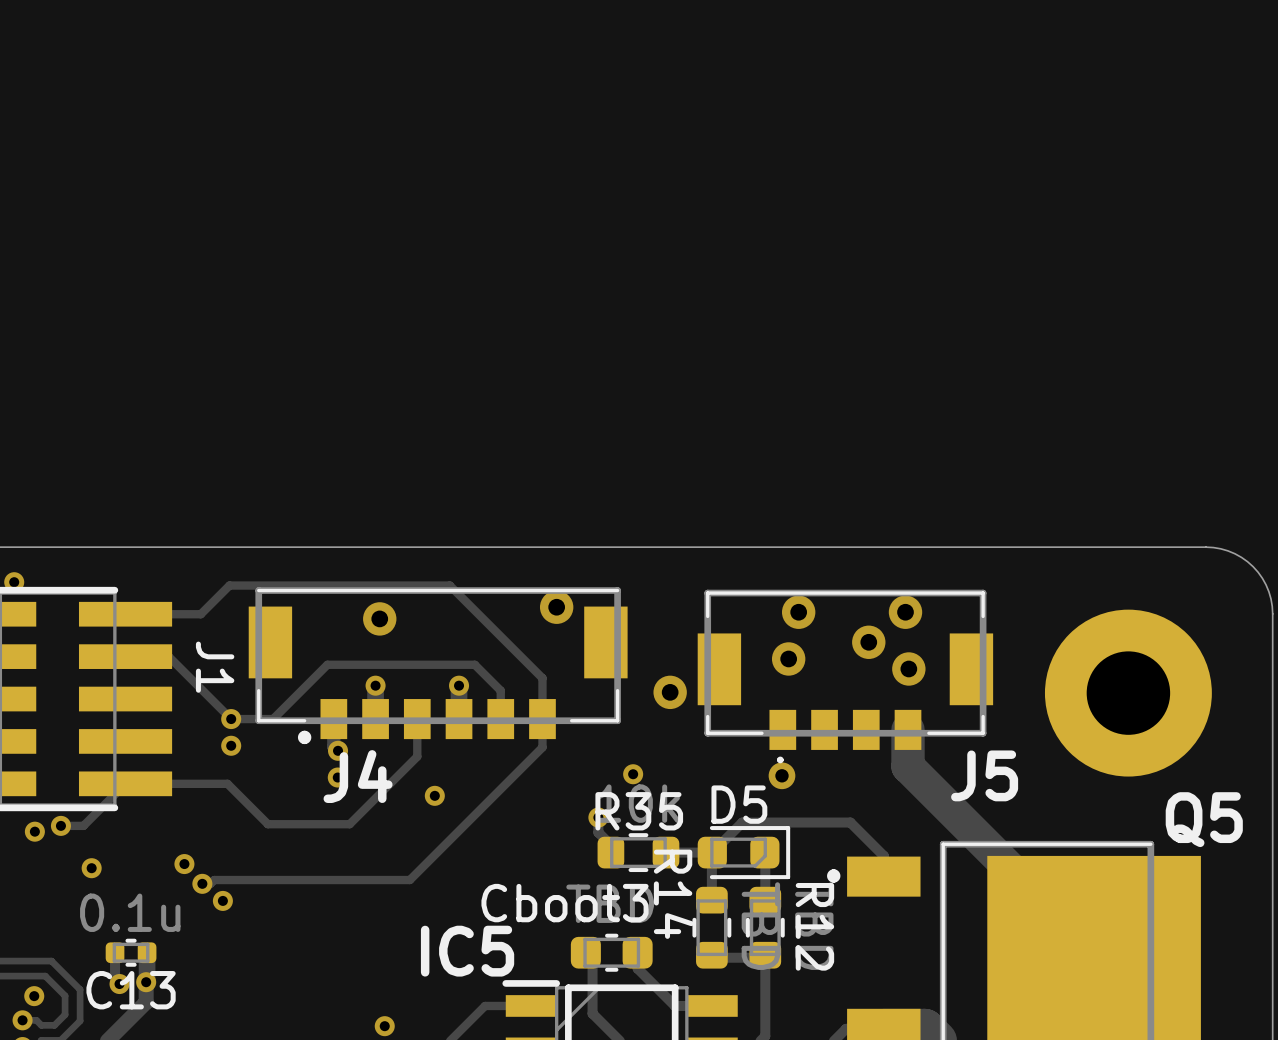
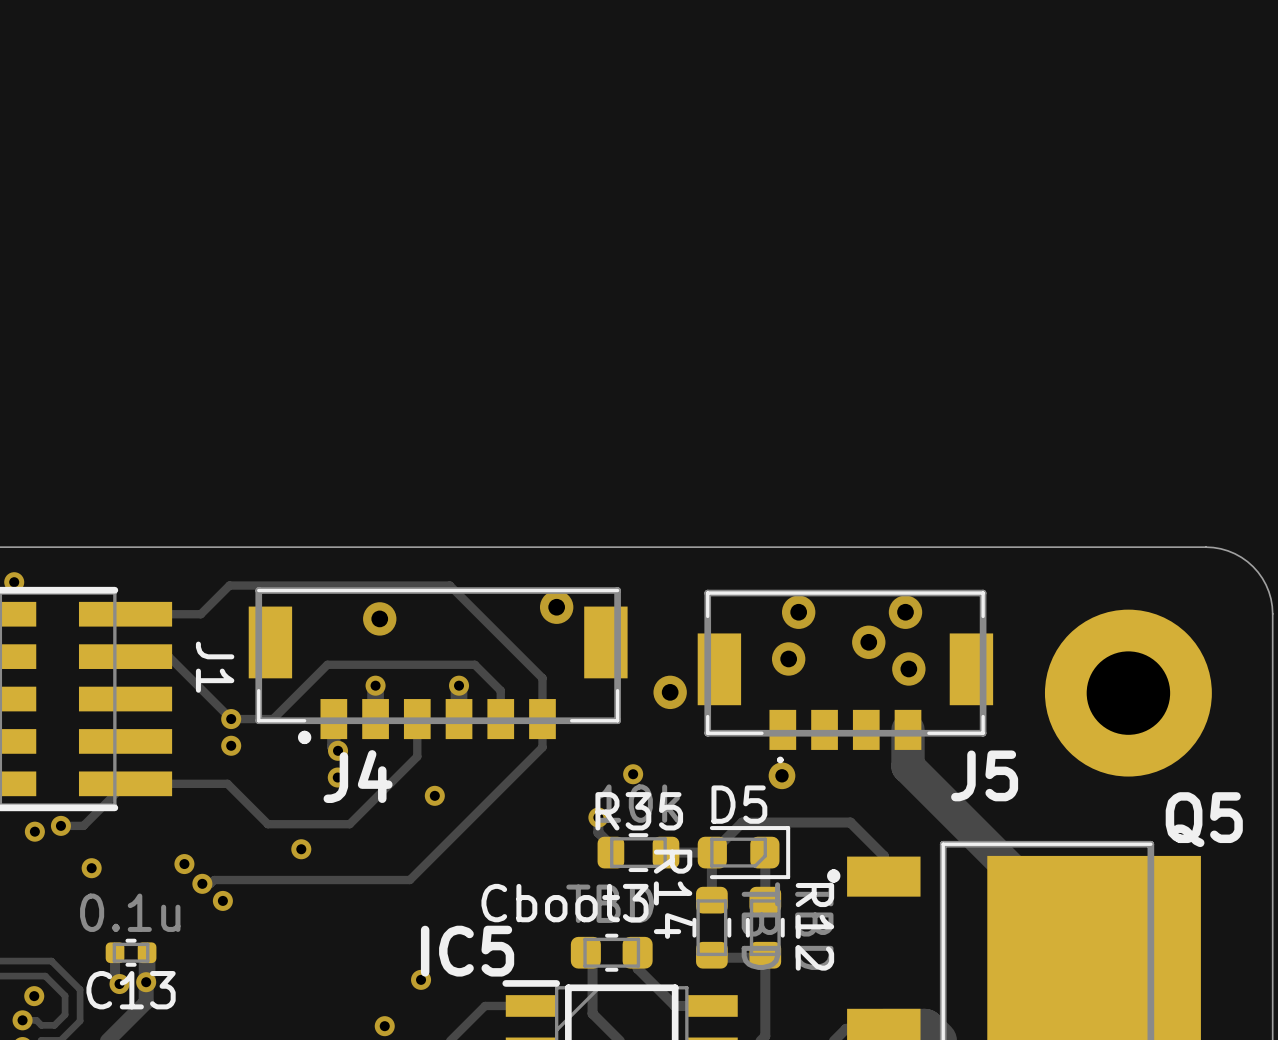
via: none -> (301, 849)
via: none -> (421, 979)

